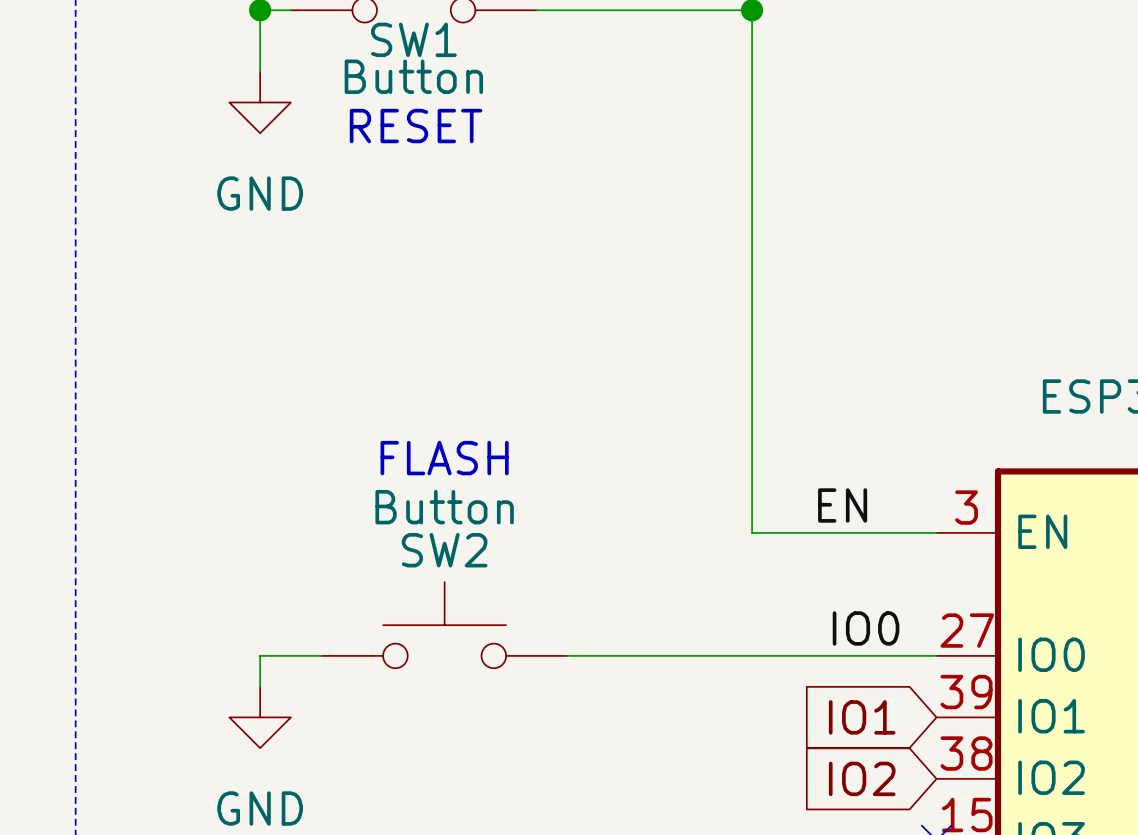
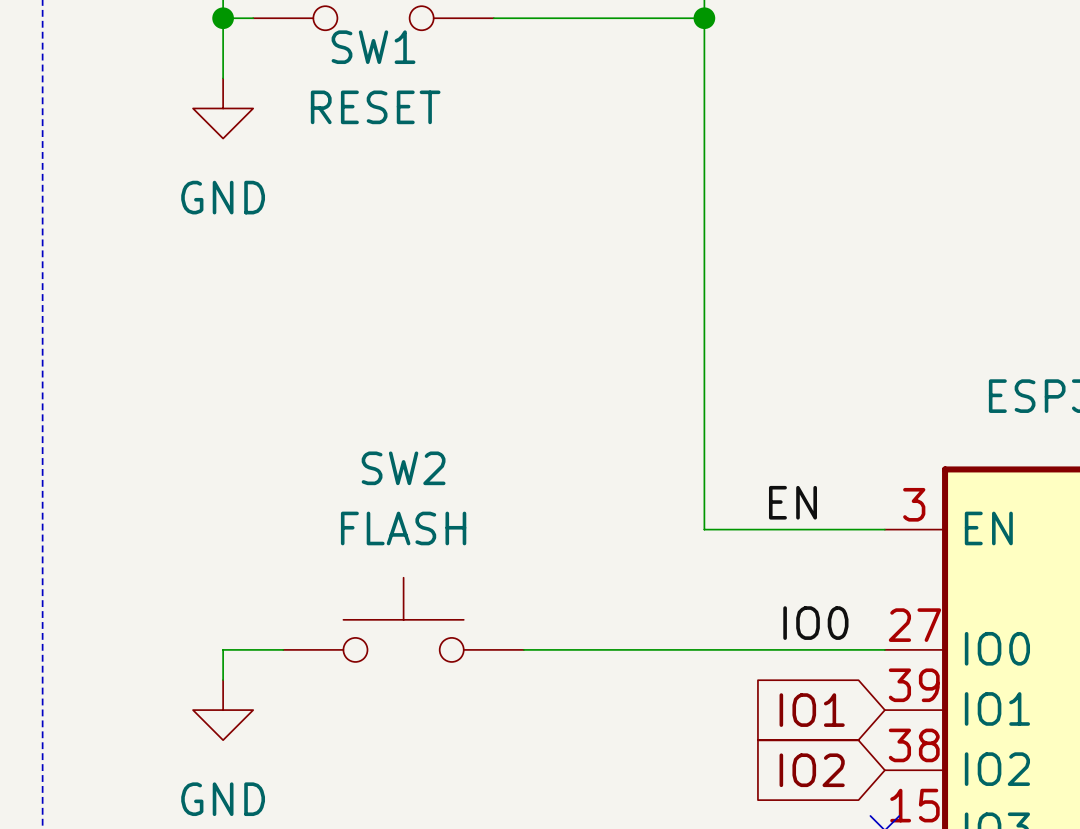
SW1 value: Button (413, 76) -> RESET (375, 107)
text: RESET (416, 126) -> none
text: FLASH (444, 458) -> none
SW2 value: Button (444, 507) -> FLASH (403, 528)
SW2 name position: SW2 (444, 550) -> SW2 (403, 468)

